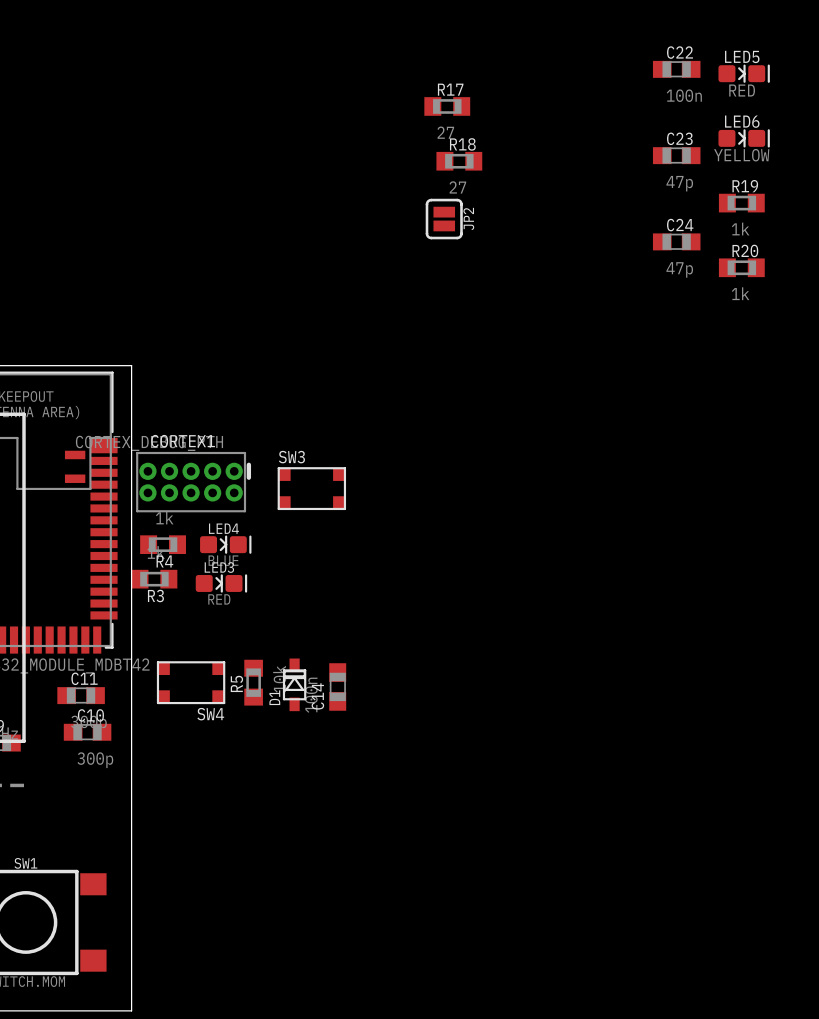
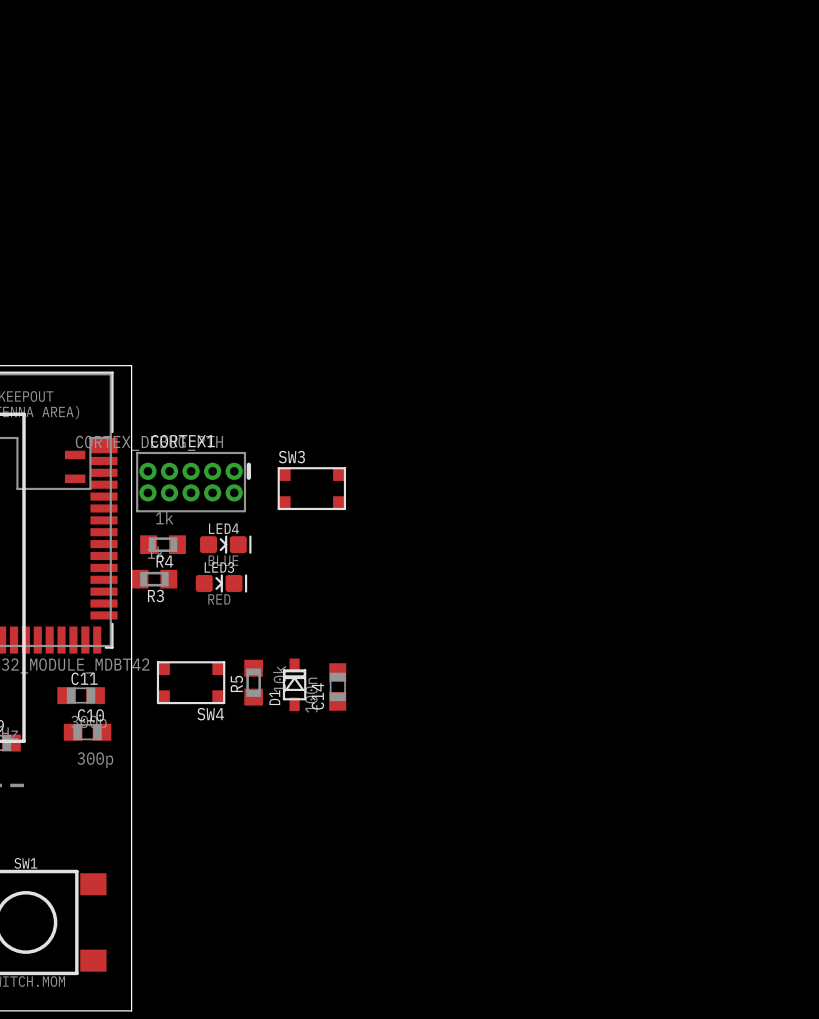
C22: 100n (676, 69) -> none
LED5: RED (744, 73) -> none
R17: 27 (447, 106) -> none
LED6: YELLOW (744, 138) -> none
C23: 47p (676, 155) -> none
R18: 27 (459, 161) -> none
R19: 1k (741, 203) -> none
JP2: (444, 219) -> none
C24: 47p (676, 241) -> none
R20: 1k (741, 267) -> none

